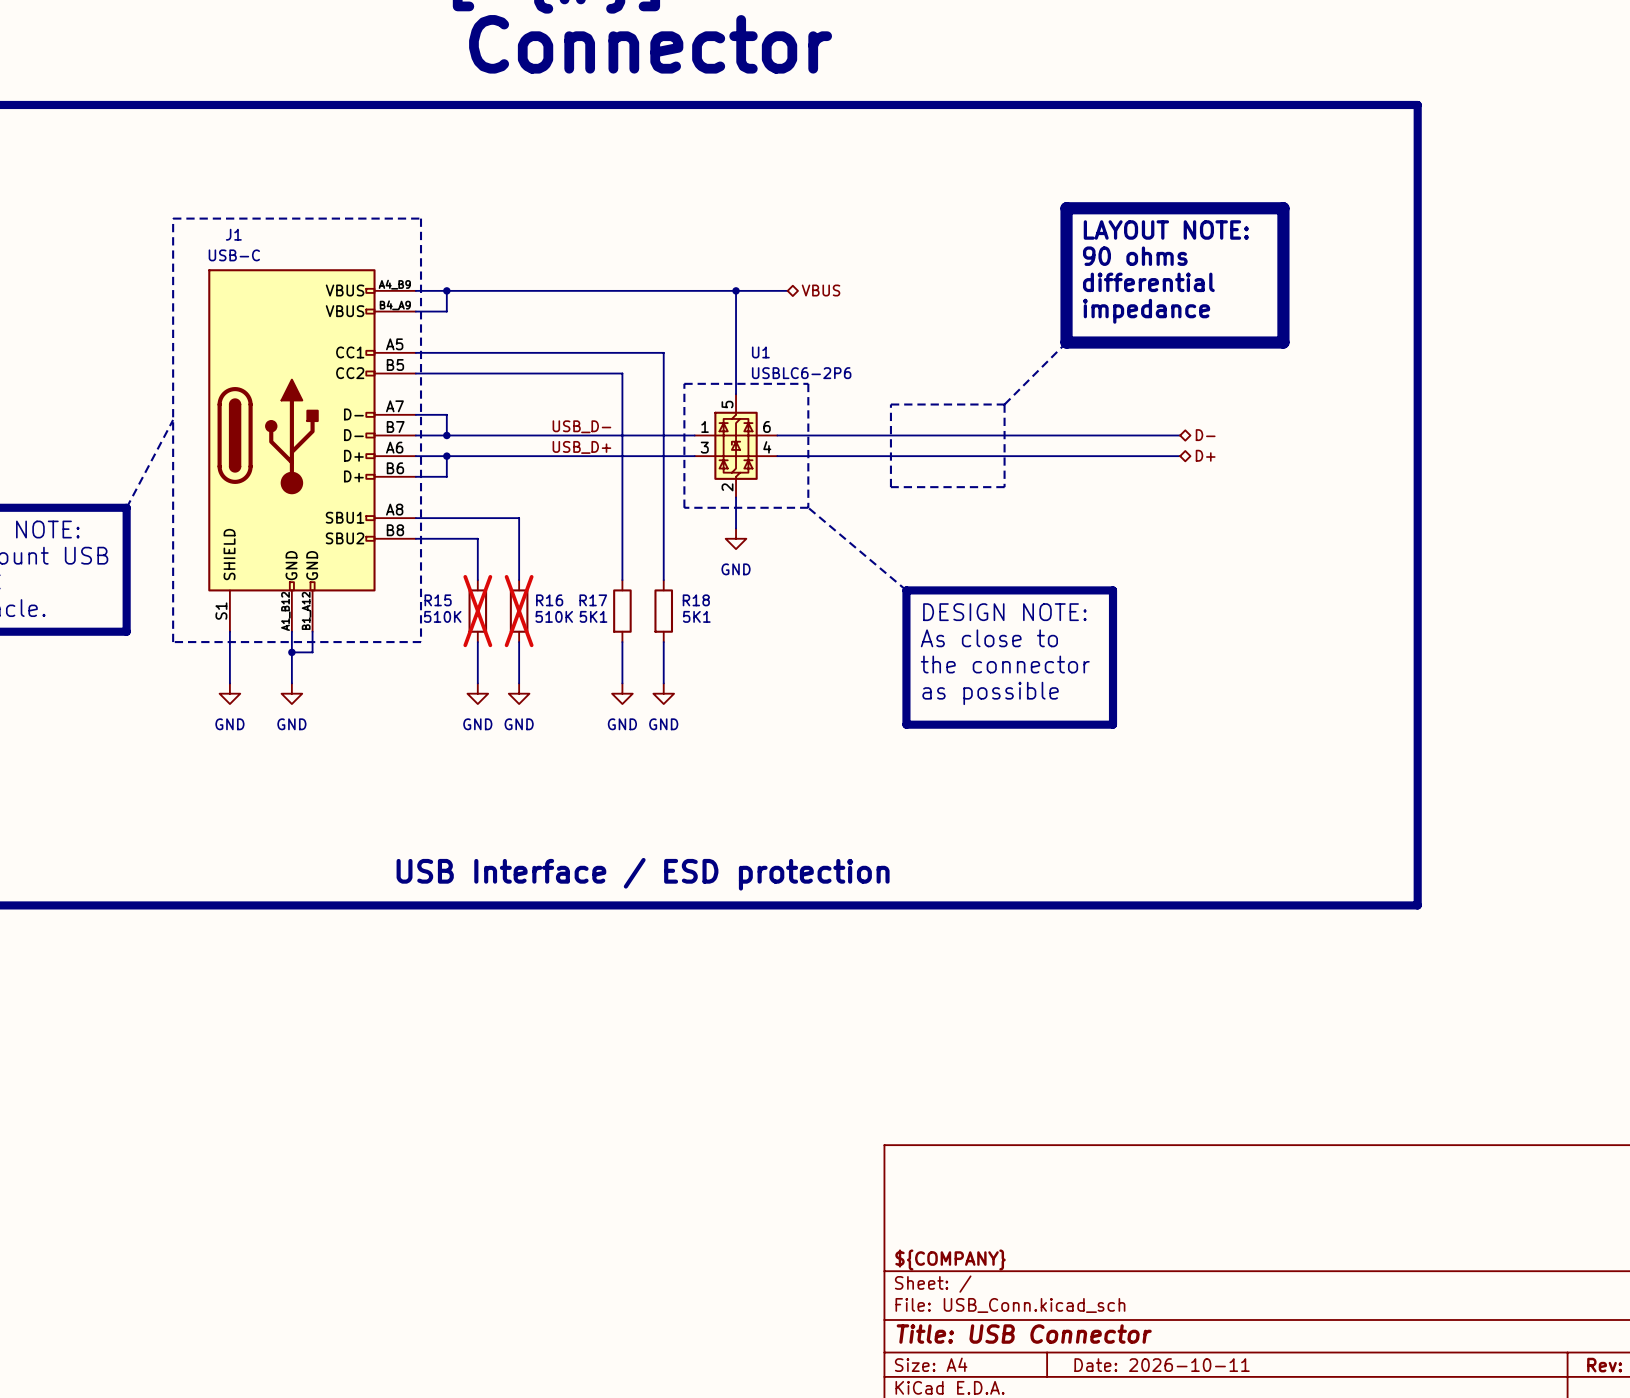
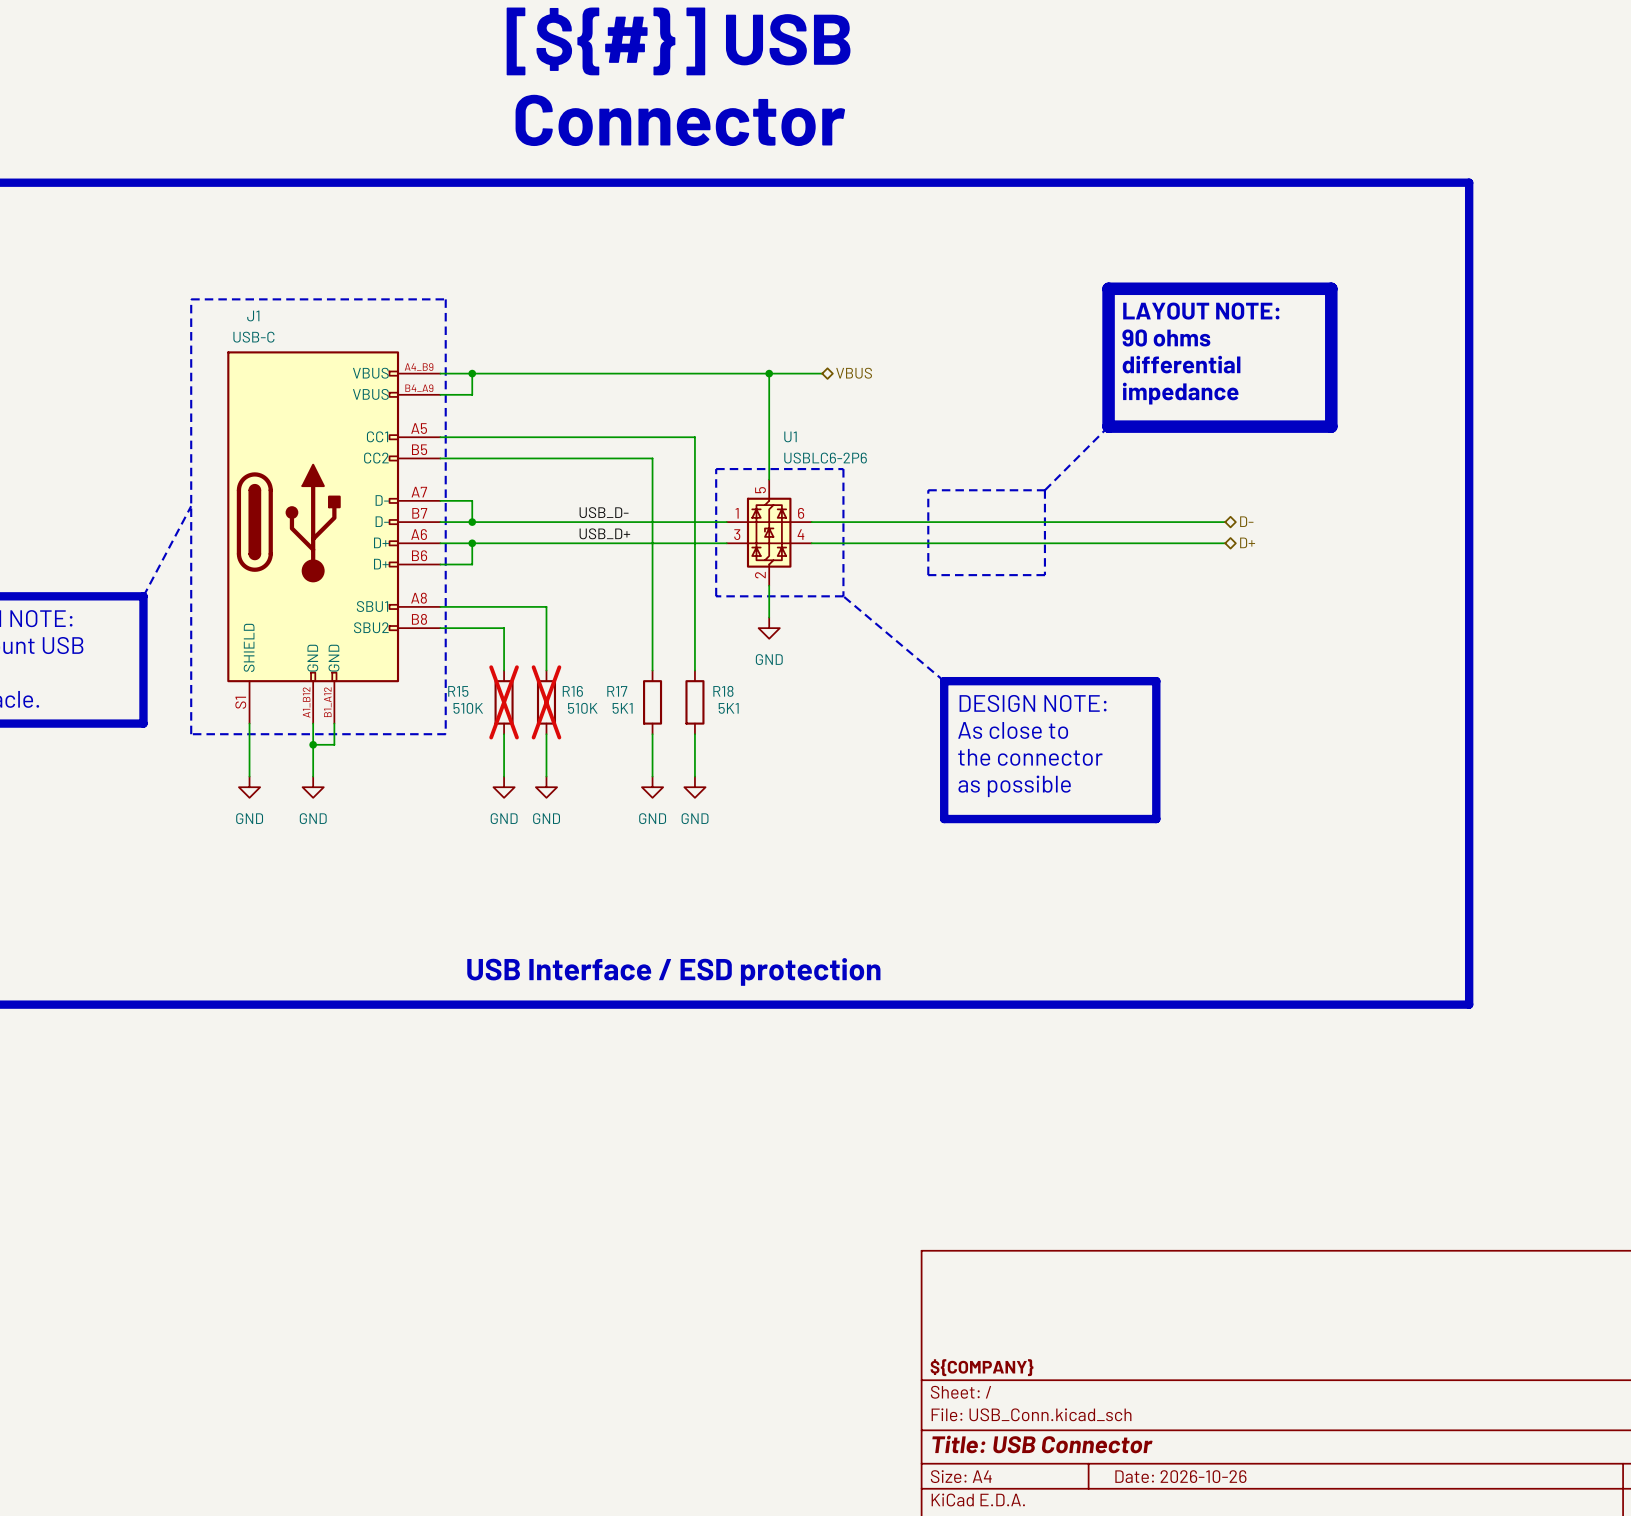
title block: Date: 2026-10-11 (1162, 1365) -> Date: 2026-10-26 (1180, 1476)

